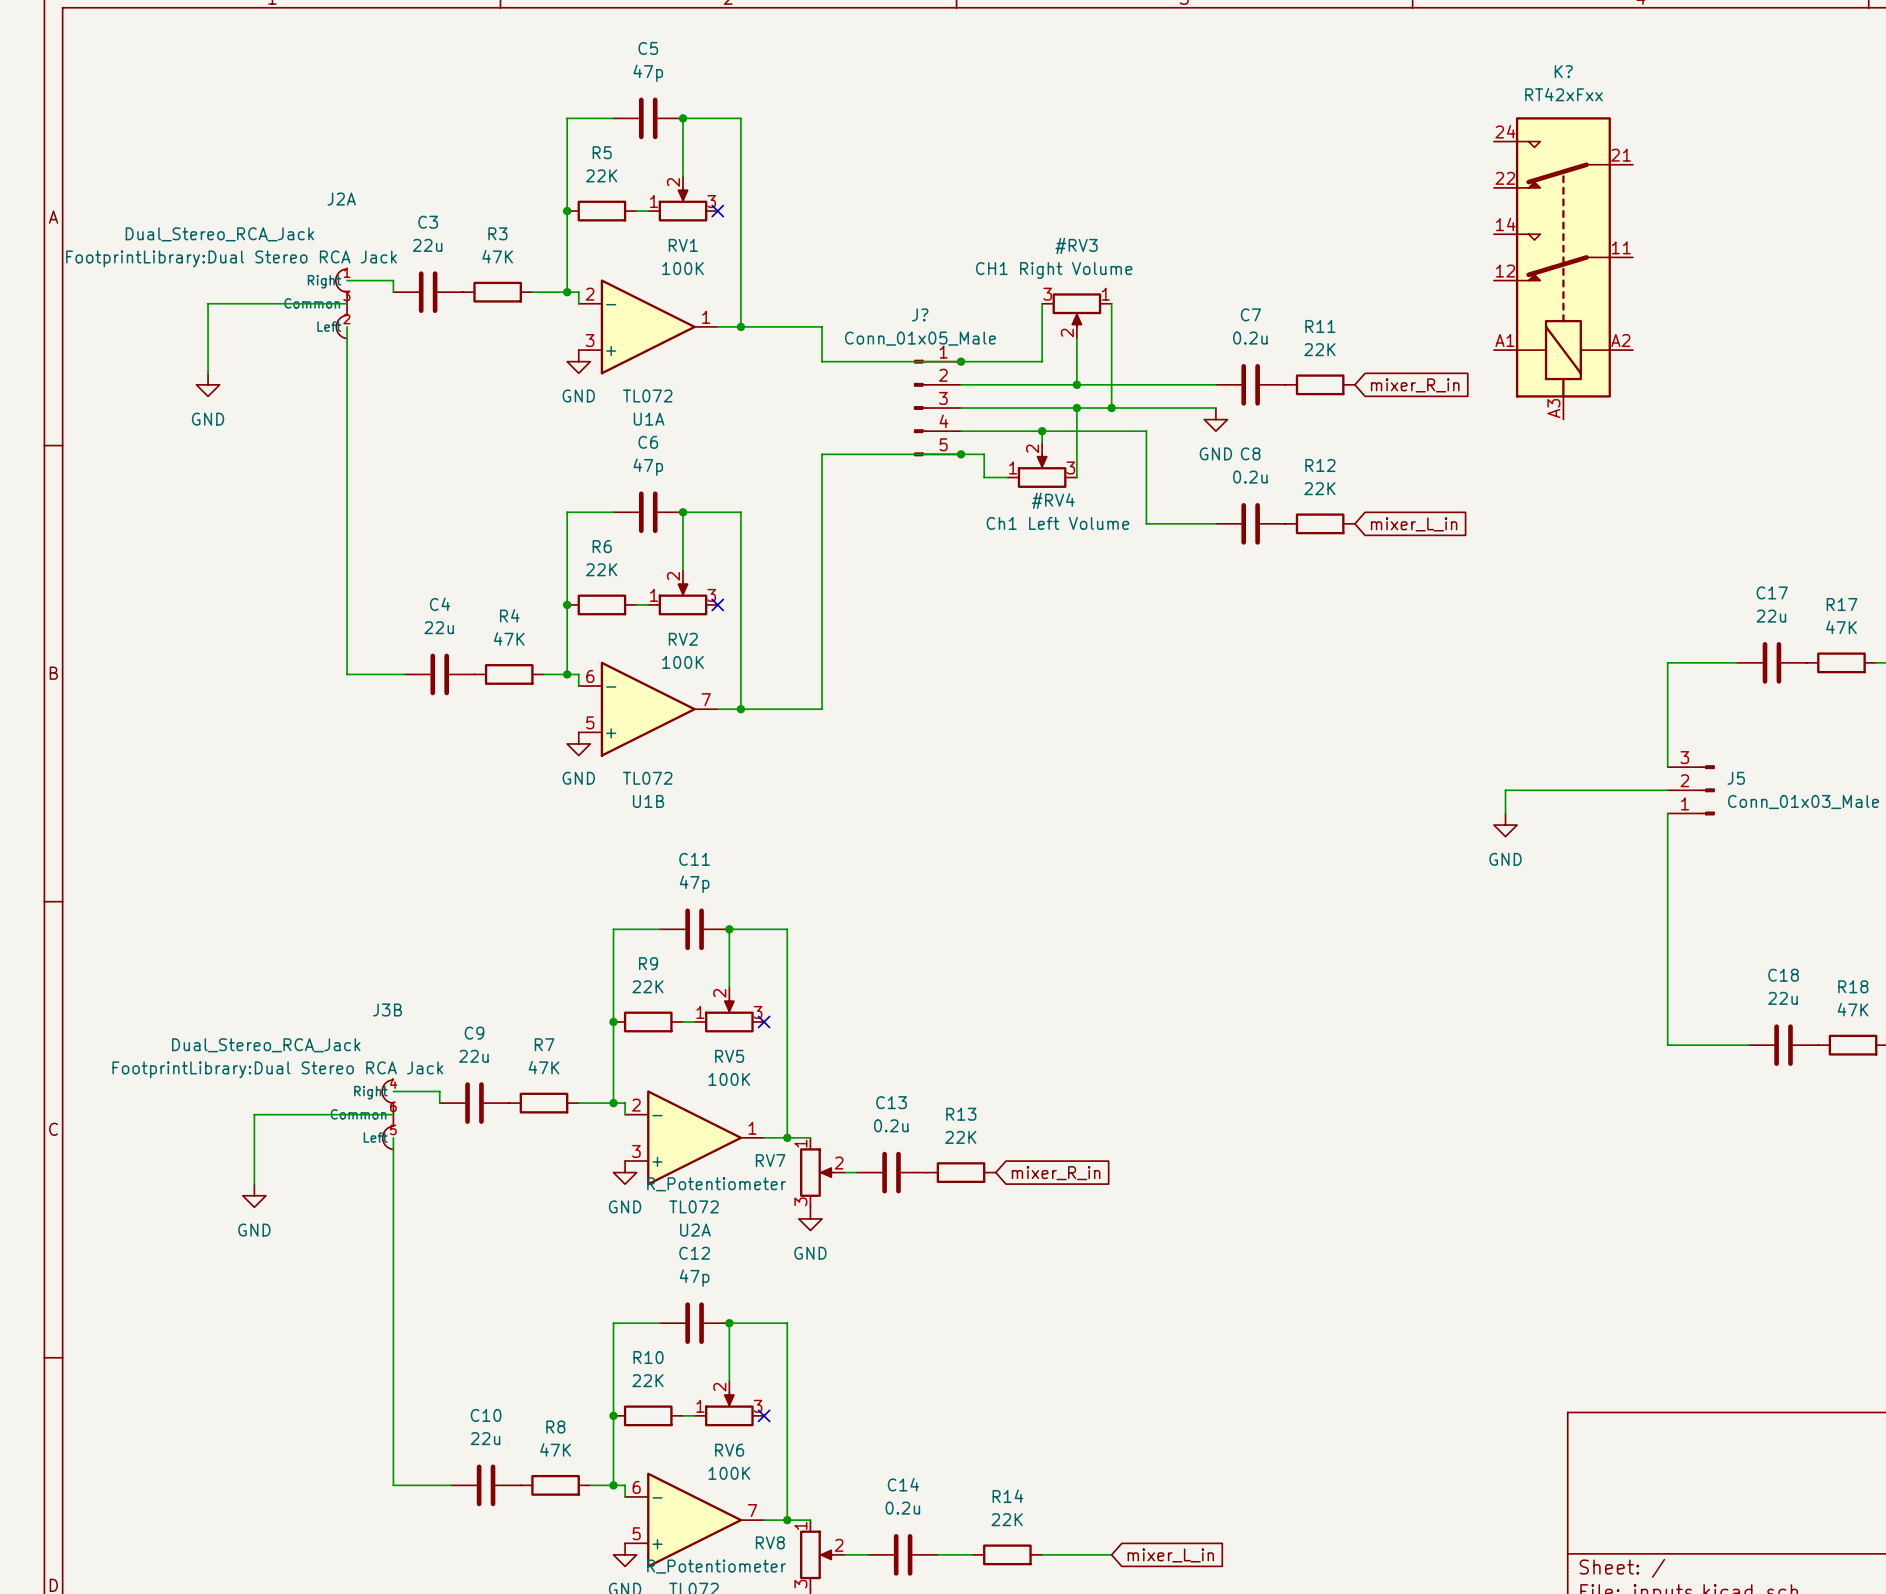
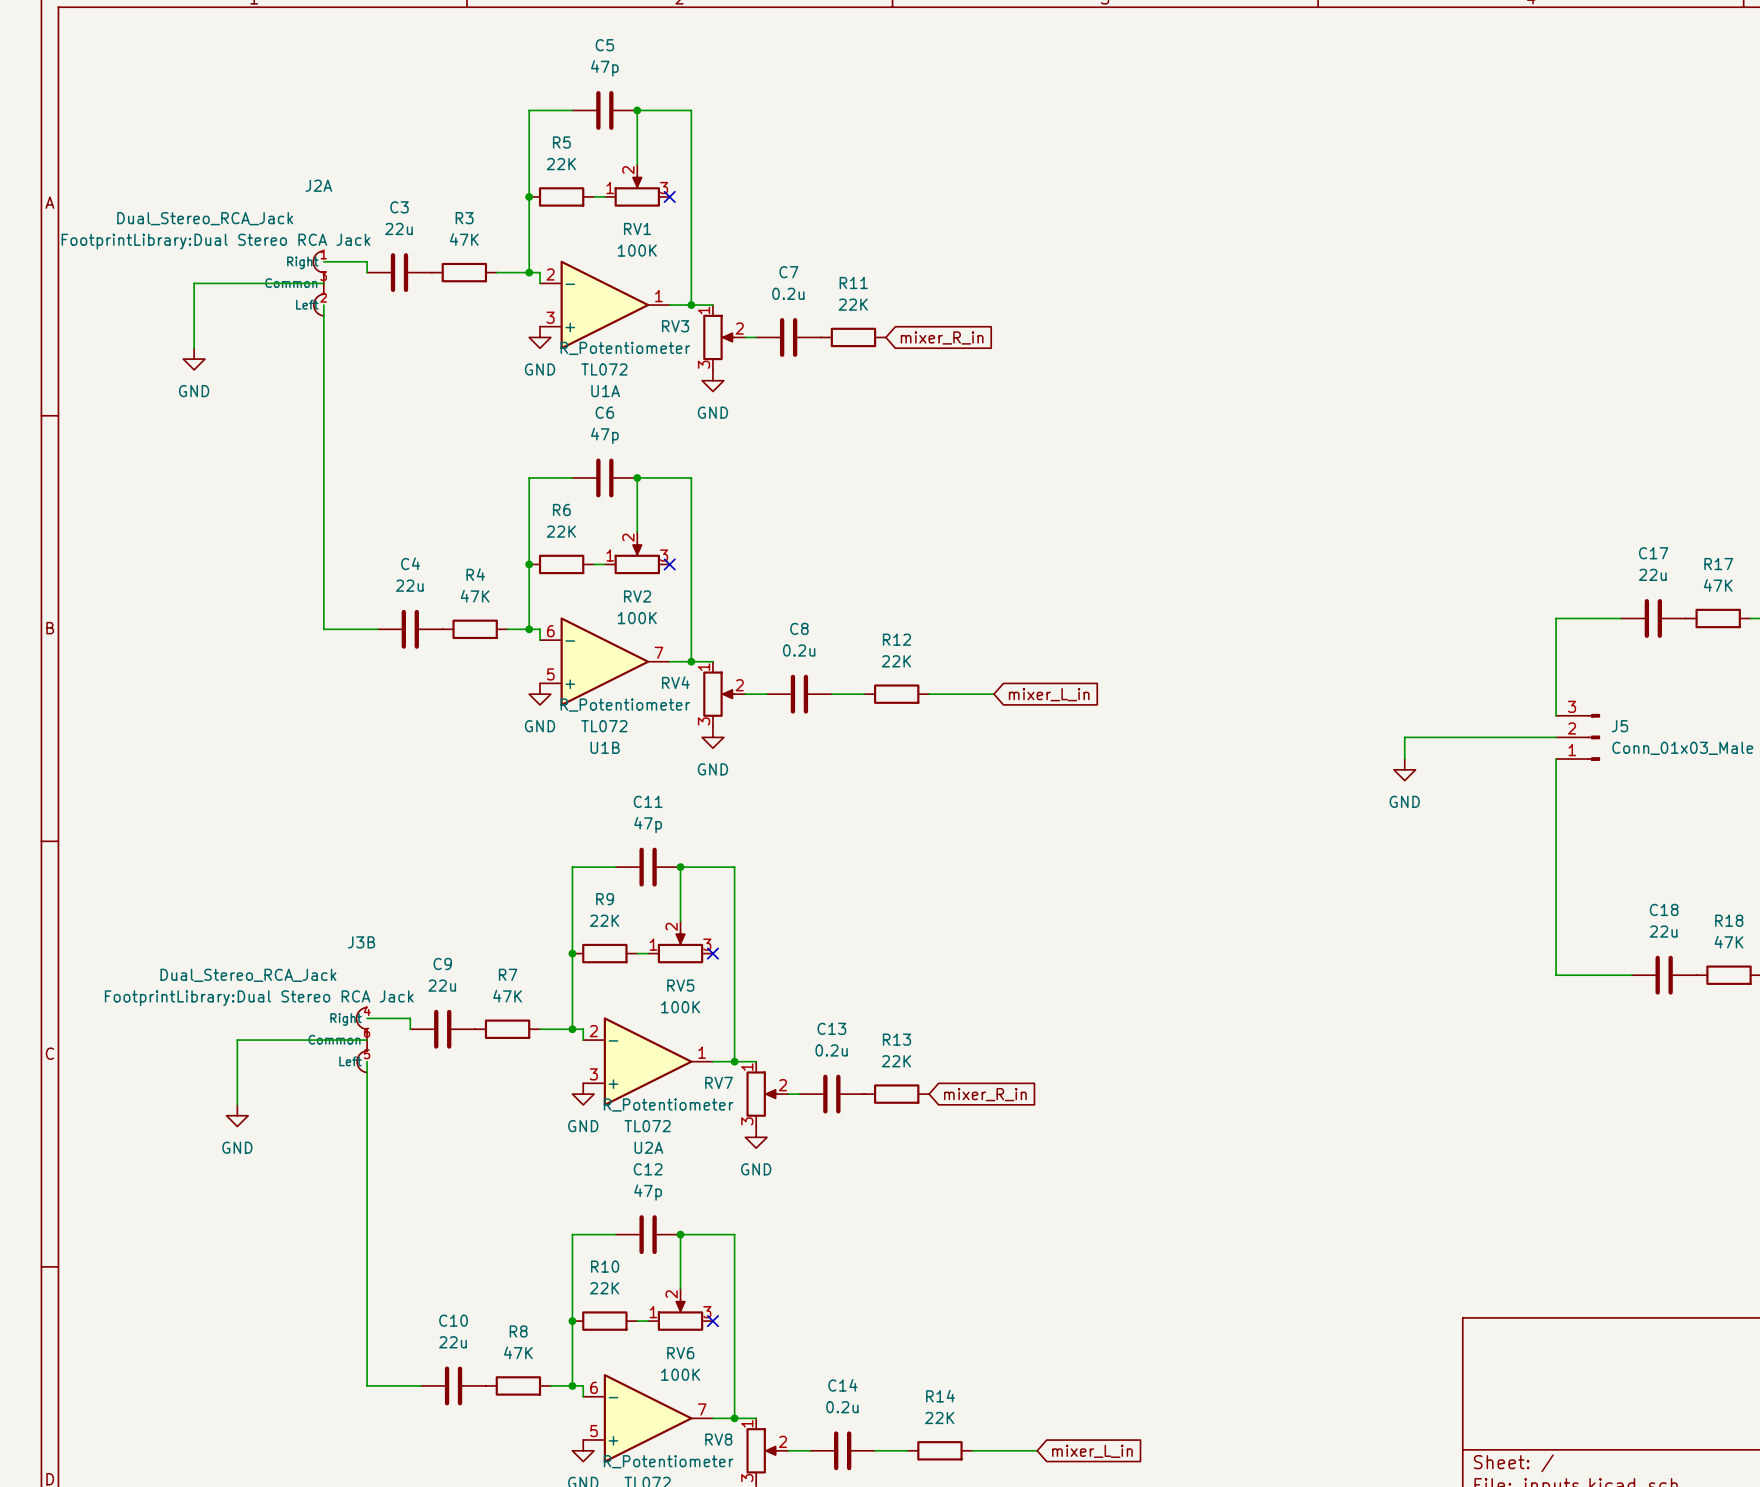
K?: RT42xFxx (1563, 268) -> none
wire: (1042, 303) (1042, 361) (822, 361) (822, 326) (764, 326) -> none
wire: (1111, 303) (1111, 408) -> none
#RV3: CH1 Right Volume (1076, 315) -> none
wire: (1076, 338) (1076, 384) -> none
RV3: none -> R_Potentiometer (724, 337)
wire: none -> (745, 337) (756, 337)
junction: (961, 361) -> none
global label: none -> mixer_R_in (942, 337)
wire: (961, 384) (1215, 384) -> none
junction: (1076, 384) -> none
C7 position: (1250, 384) -> (788, 337)
R11 position: (1320, 384) -> (853, 337)
global label: mixer_R_in (1415, 385) -> none
power symbol: none -> GND (712, 380)
J?: Conn_01x05_Male (937, 408) -> none
wire: (961, 408) (1215, 408) -> none
wire: (1076, 408) (1076, 477) -> none
junction: (1076, 408) -> none
junction: (1111, 408) -> none
power symbol: GND (1215, 419) -> none
wire: (961, 431) (1146, 431) (1146, 523) (1215, 523) -> none
wire: (1042, 431) (1042, 442) -> none
junction: (1042, 431) -> none
junction: (961, 454) -> none
#RV4: Ch1 Left Volume (1042, 465) -> none
wire: (1007, 477) (984, 477) (984, 454) (822, 454) (822, 709) (764, 709) -> none
C8 position: (1250, 523) -> (799, 694)
R12 position: (1320, 523) -> (896, 694)
global label: mixer_L_in (1414, 524) -> none
RV4: none -> R_Potentiometer (724, 694)
wire: none -> (745, 694) (767, 694)
wire: none -> (831, 694) (864, 694)
wire: none -> (929, 694) (993, 694)
global label: none -> mixer_L_in (1049, 694)
power symbol: none -> GND (712, 737)

